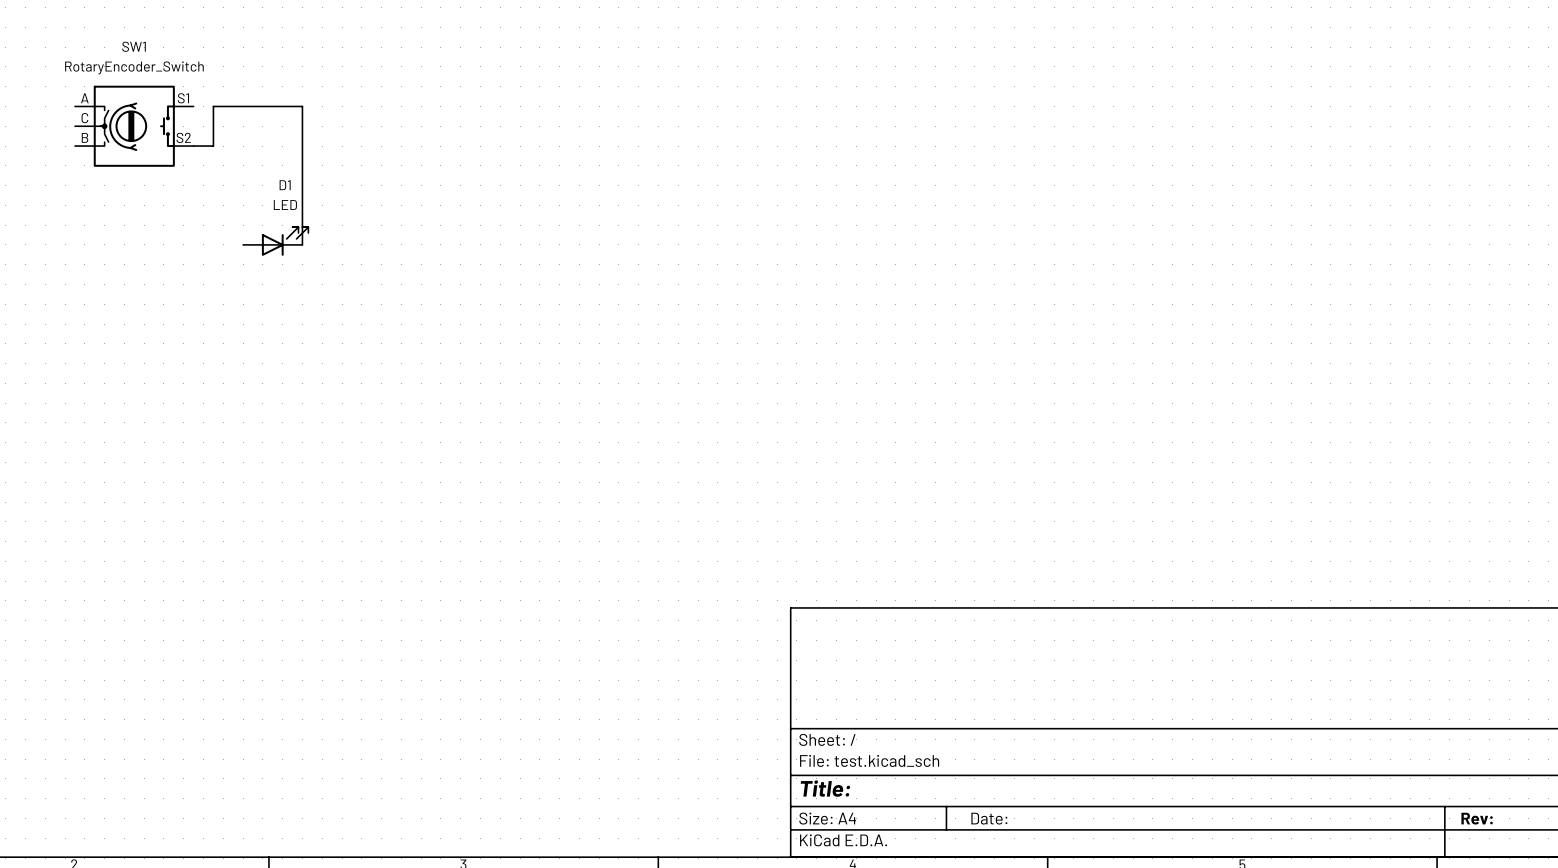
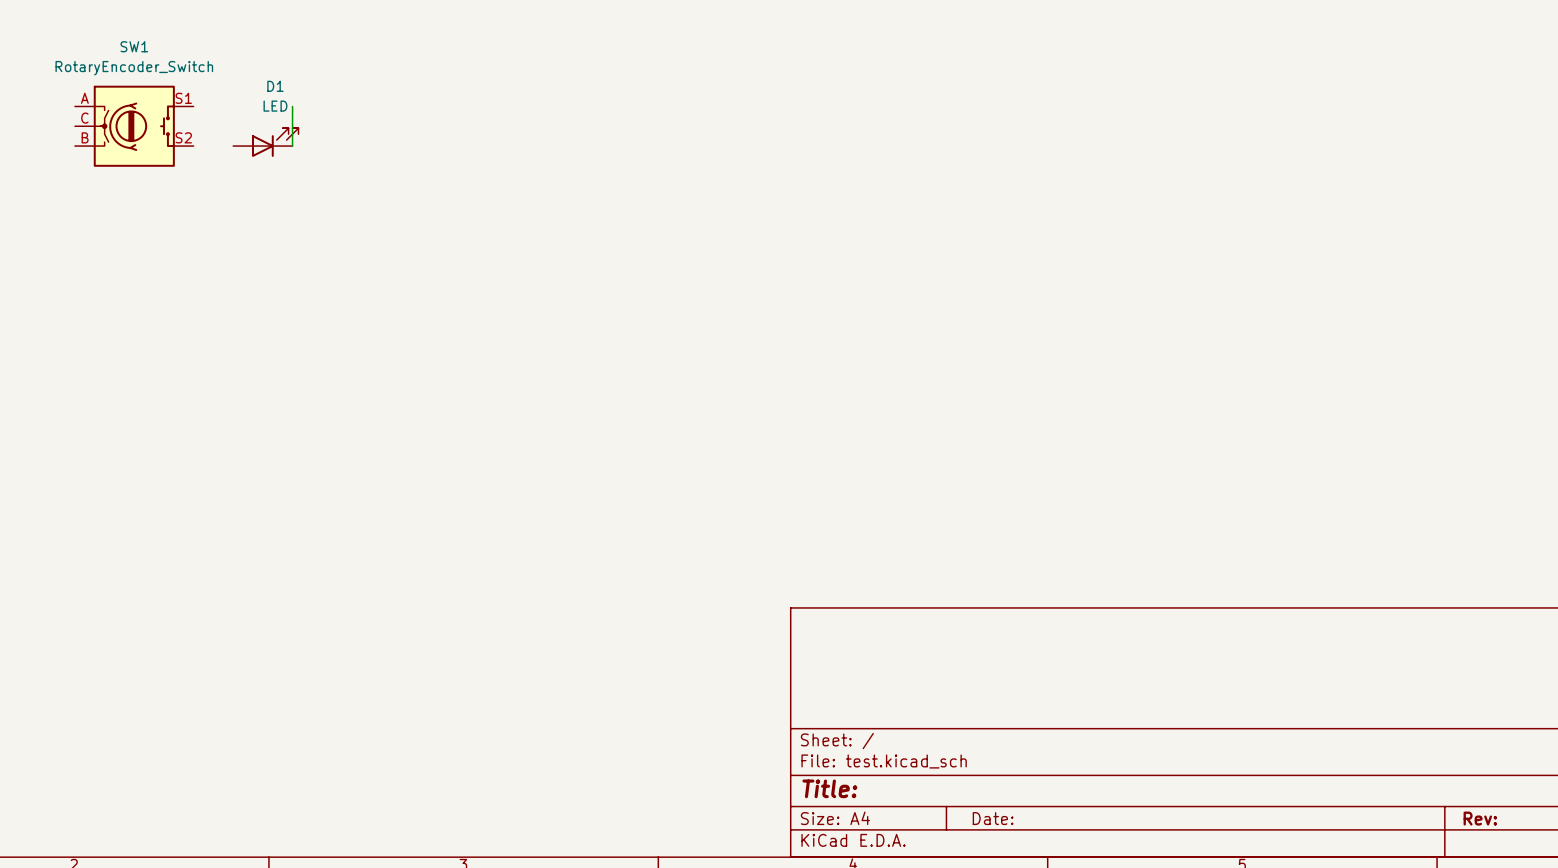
wire: none -> (292, 106) (292, 146)
wire: (193, 146) (213, 146) (213, 106) (302, 106) (302, 244) -> none
D1 position: (275, 241) -> (265, 142)

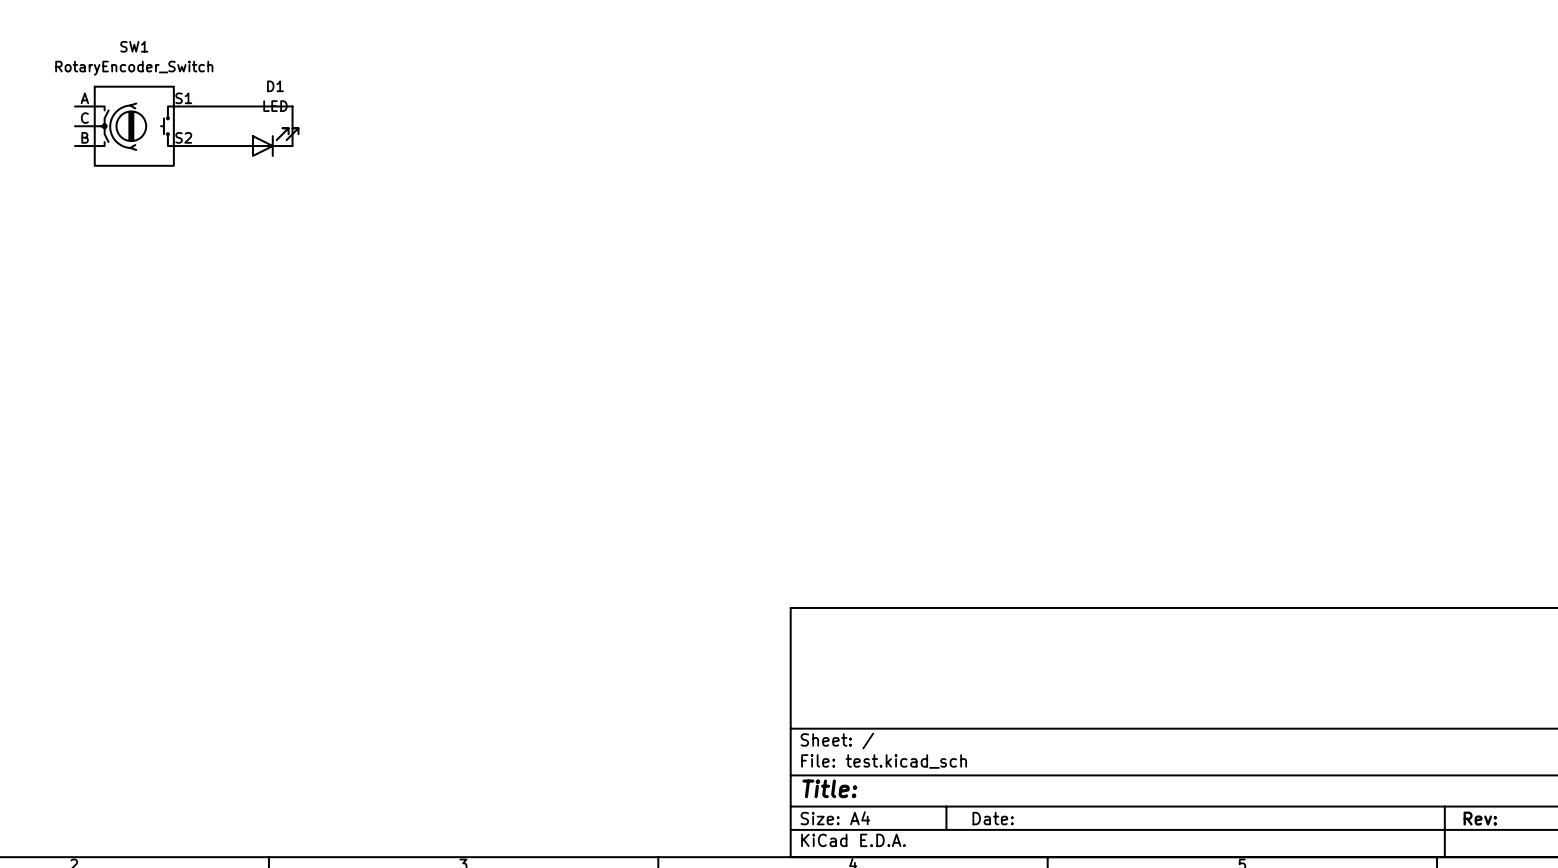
wire: none -> (193, 106) (292, 106)
wire: none -> (193, 146) (233, 146)

